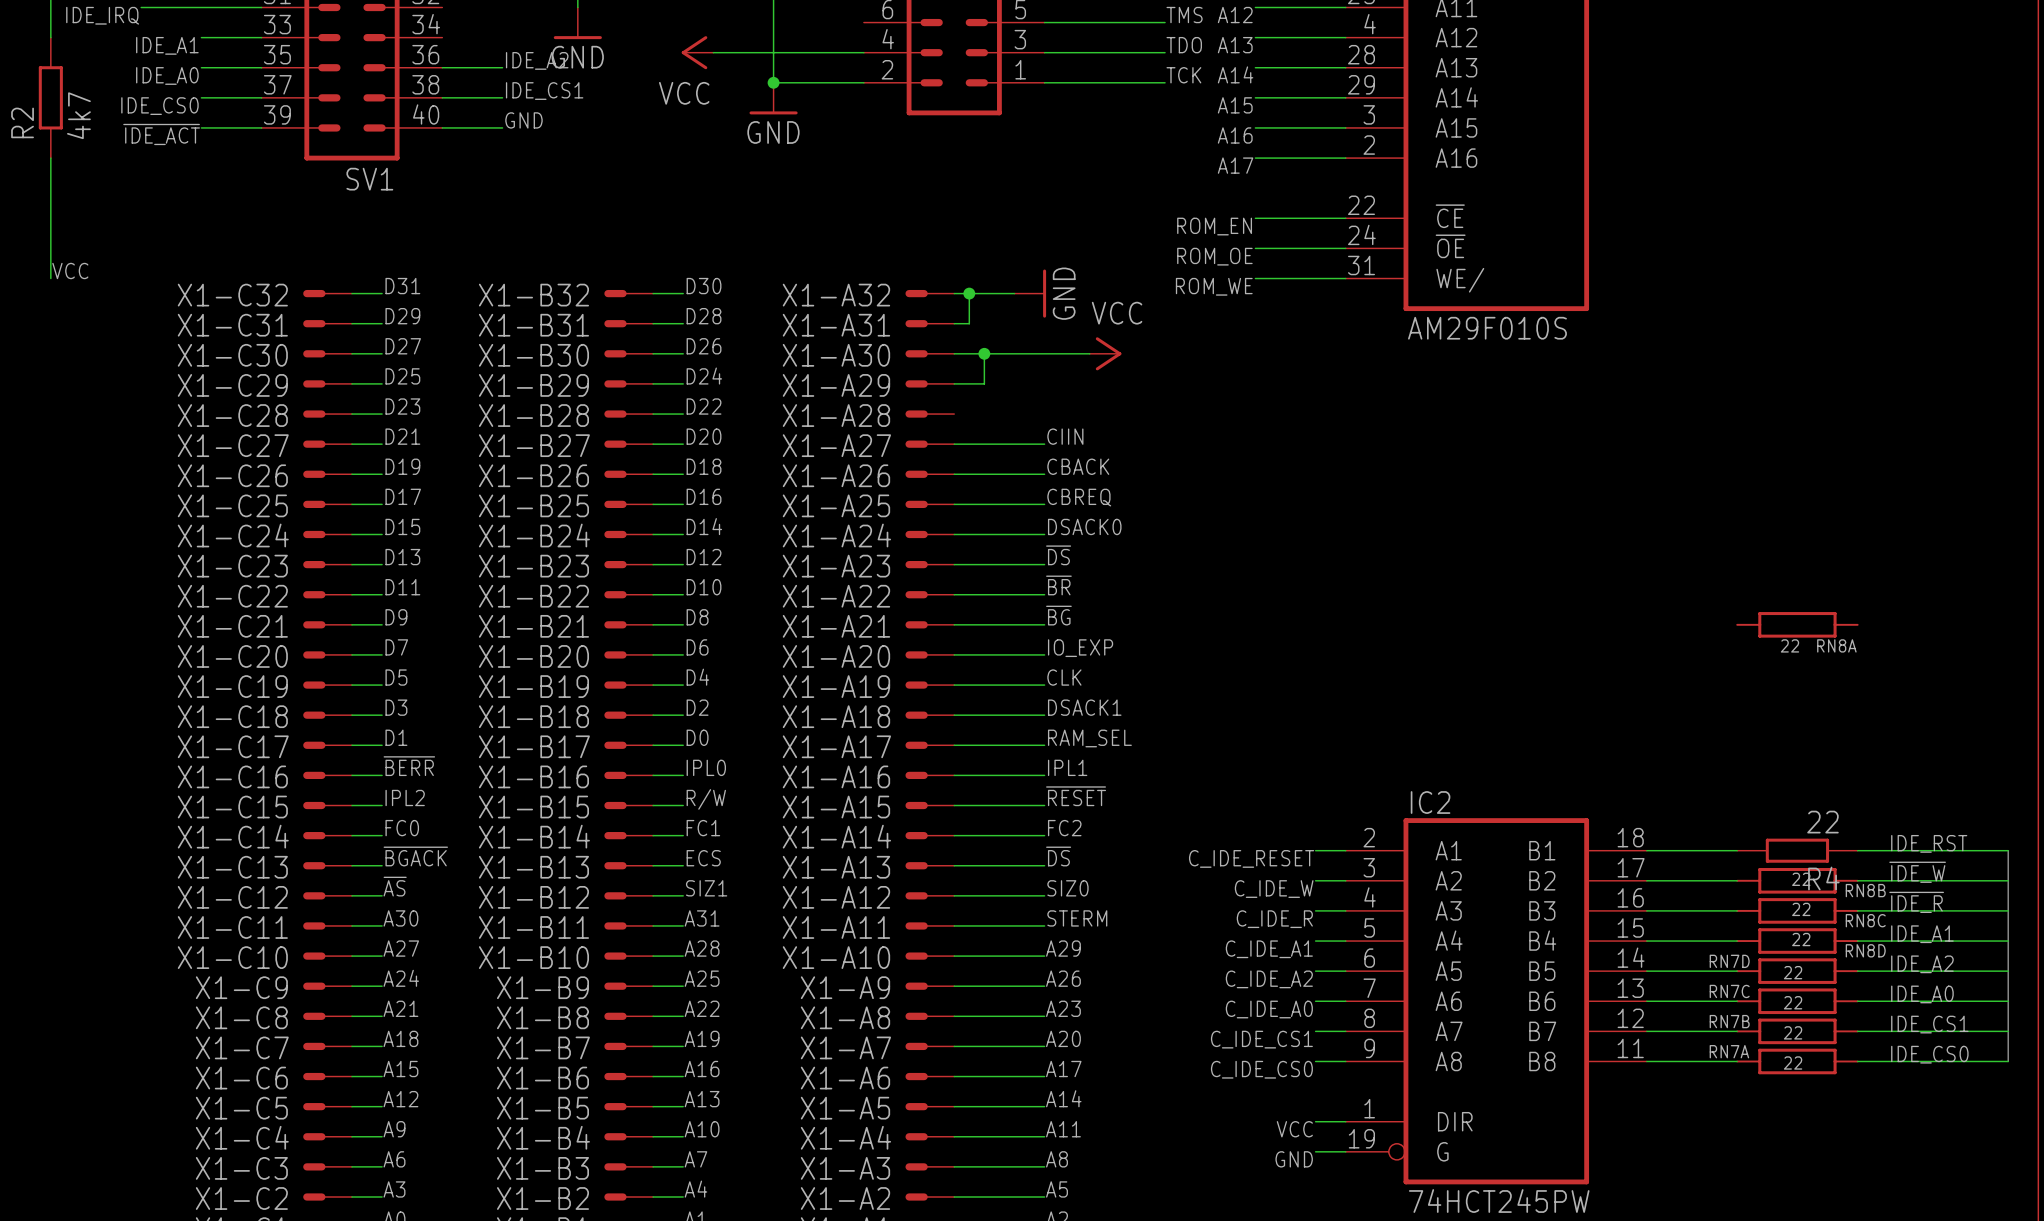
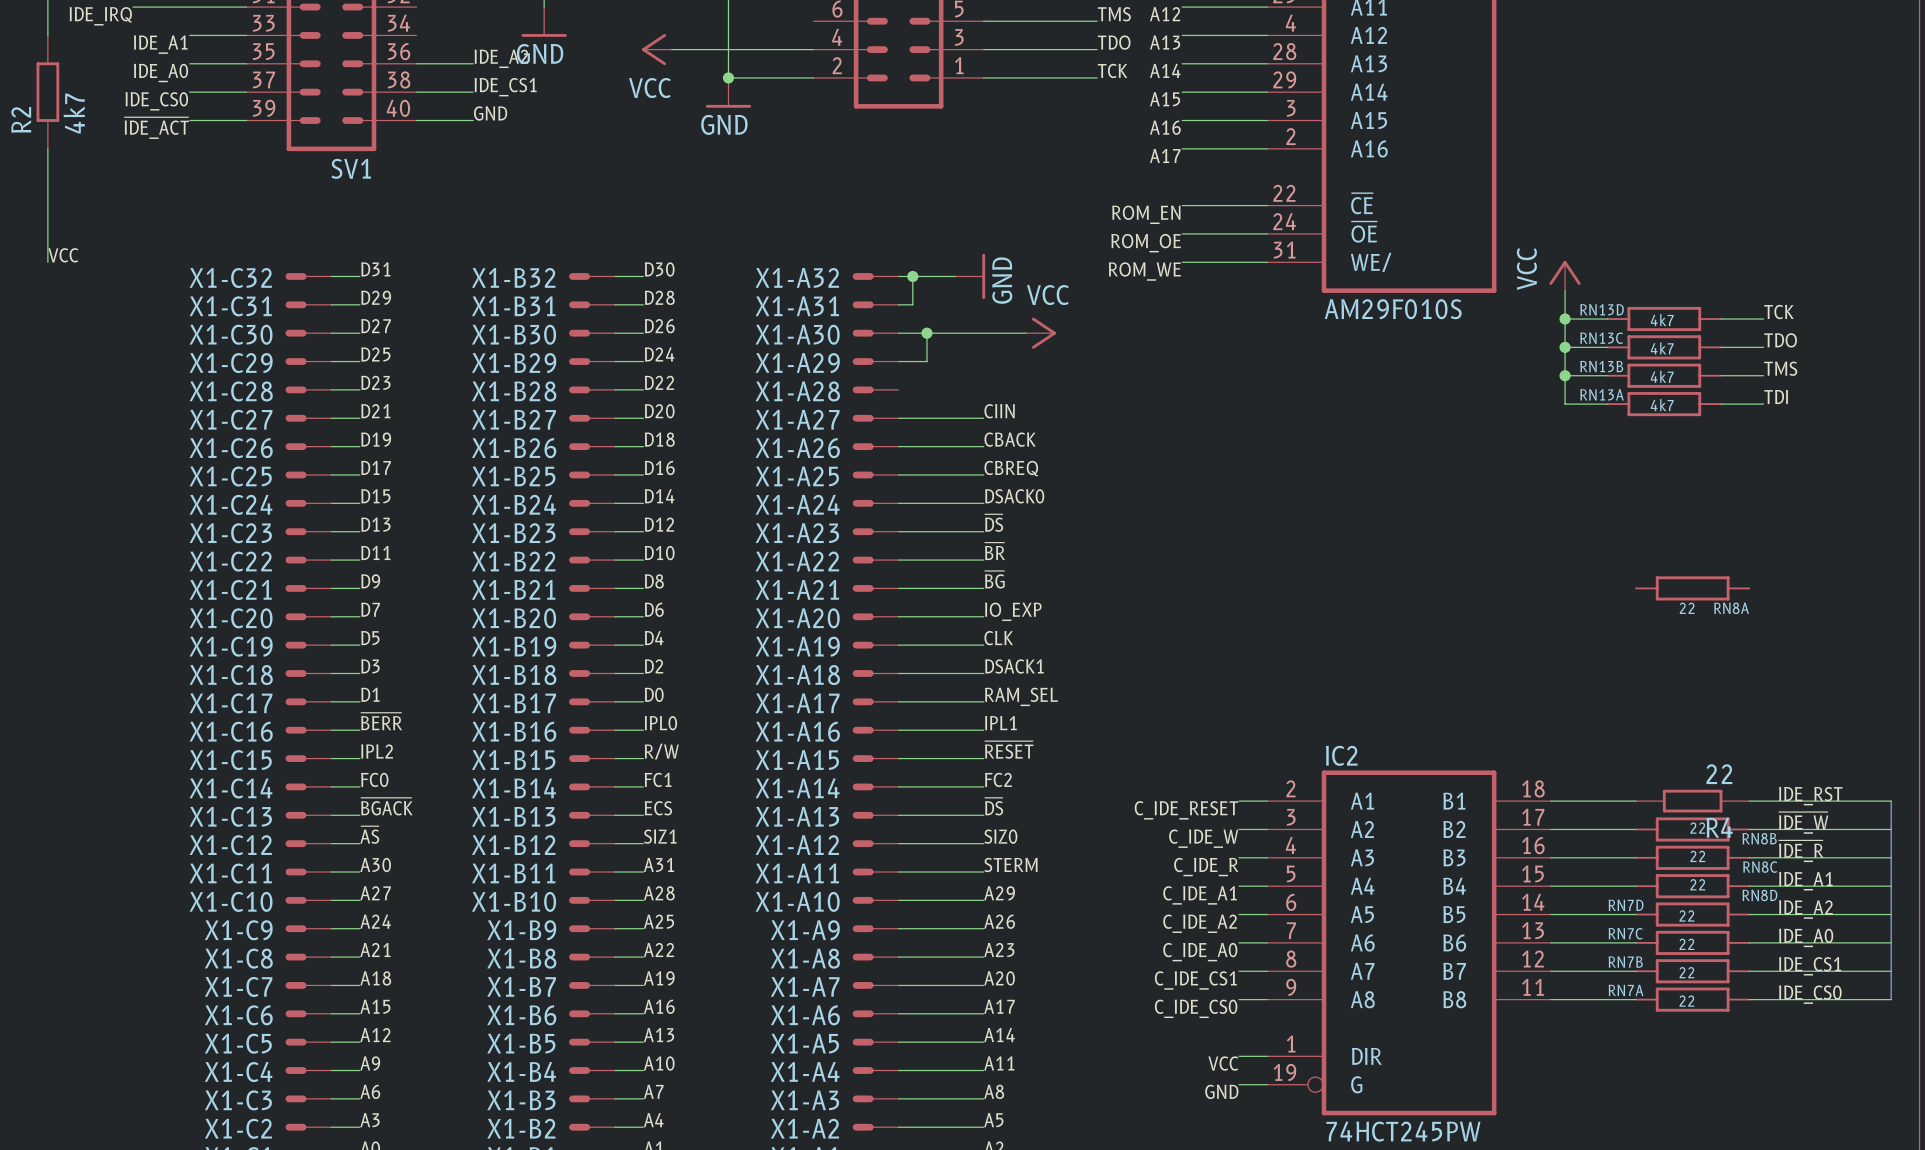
power symbol: none -> VCC (1565, 275)
wire: none -> (1565, 290) (1565, 404) (1607, 404)
label: none -> TCK (1778, 312)
wire: none -> (1565, 319) (1607, 319)
junction: none -> (1565, 319)
RN13D: none -> 4k7 (1664, 319)
wire: none -> (1721, 319) (1763, 319)
label: none -> TDO (1780, 340)
wire: none -> (1565, 347) (1607, 347)
junction: none -> (1565, 347)
RN13C: none -> 4k7 (1664, 347)
wire: none -> (1721, 347) (1763, 347)
label: none -> TMS (1780, 368)
wire: none -> (1565, 375) (1607, 375)
junction: none -> (1565, 375)
RN13B: none -> 4k7 (1664, 375)
wire: none -> (1721, 375) (1763, 375)
label: none -> TDI (1776, 397)
RN13A: none -> 4k7 (1664, 404)
wire: none -> (1721, 404) (1763, 404)

